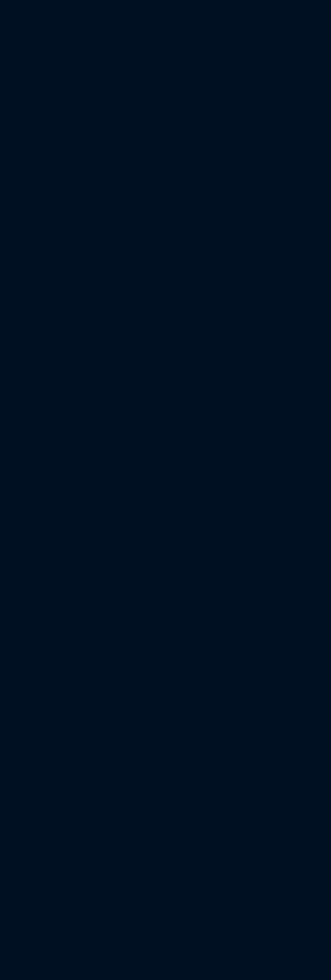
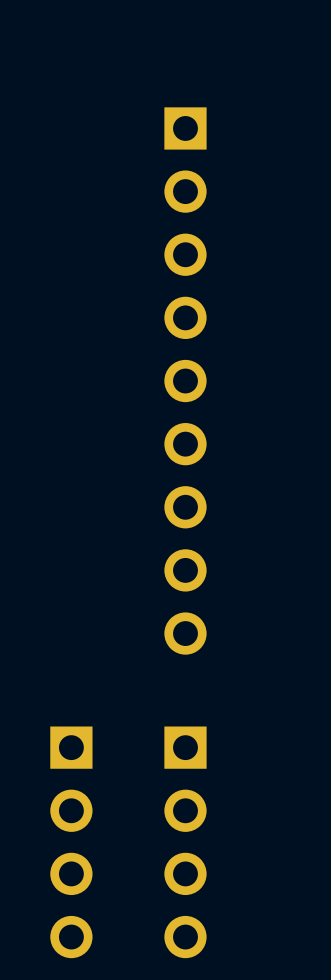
part: none -> (185, 381)
part: none -> (71, 842)
part: none -> (185, 842)

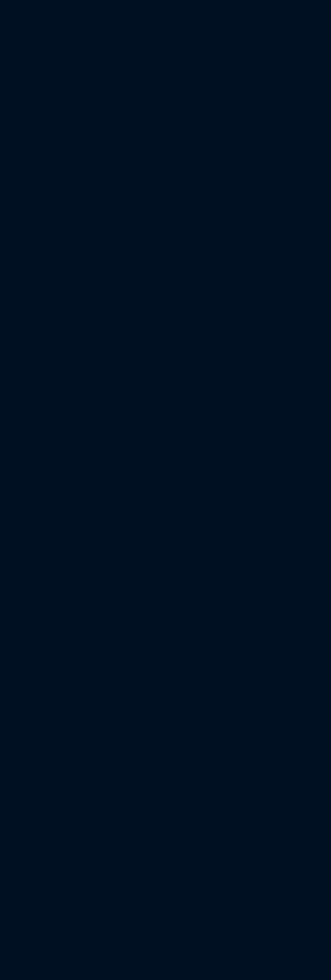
part: (185, 381) -> none
part: (71, 842) -> none
part: (185, 842) -> none

